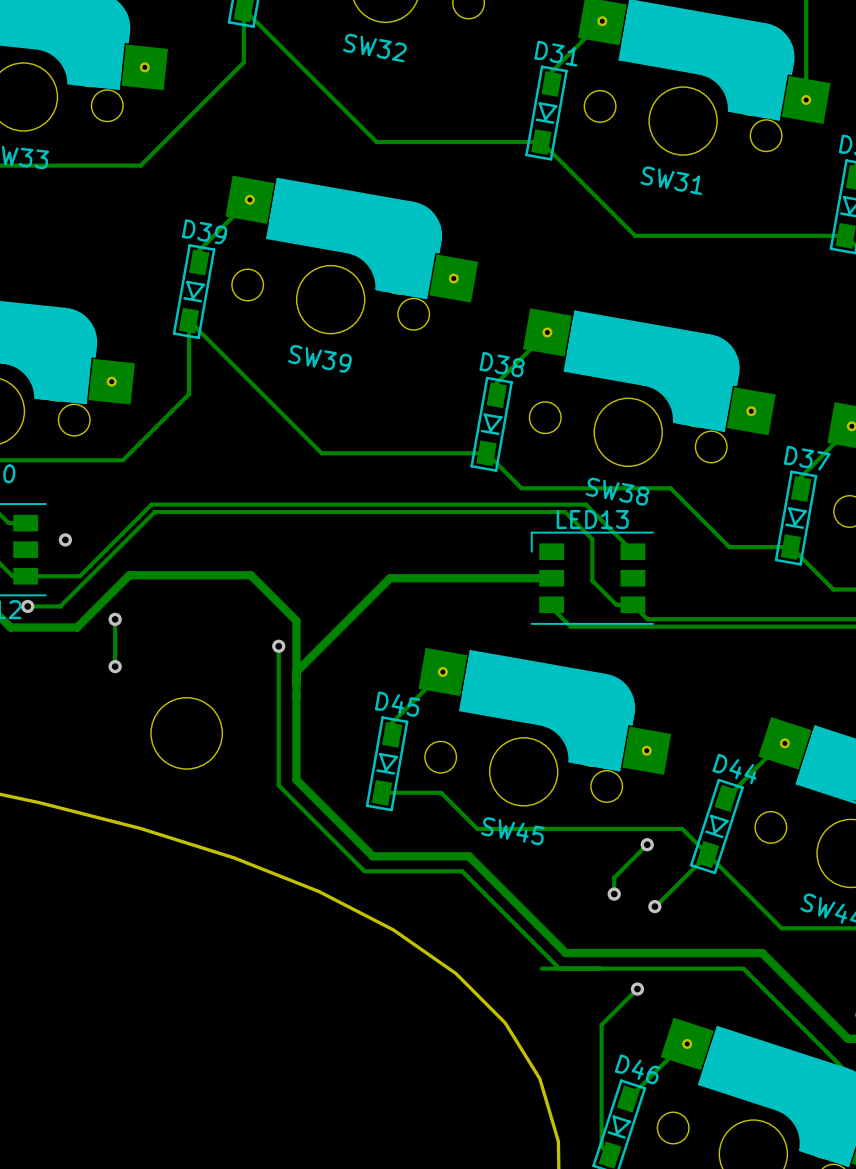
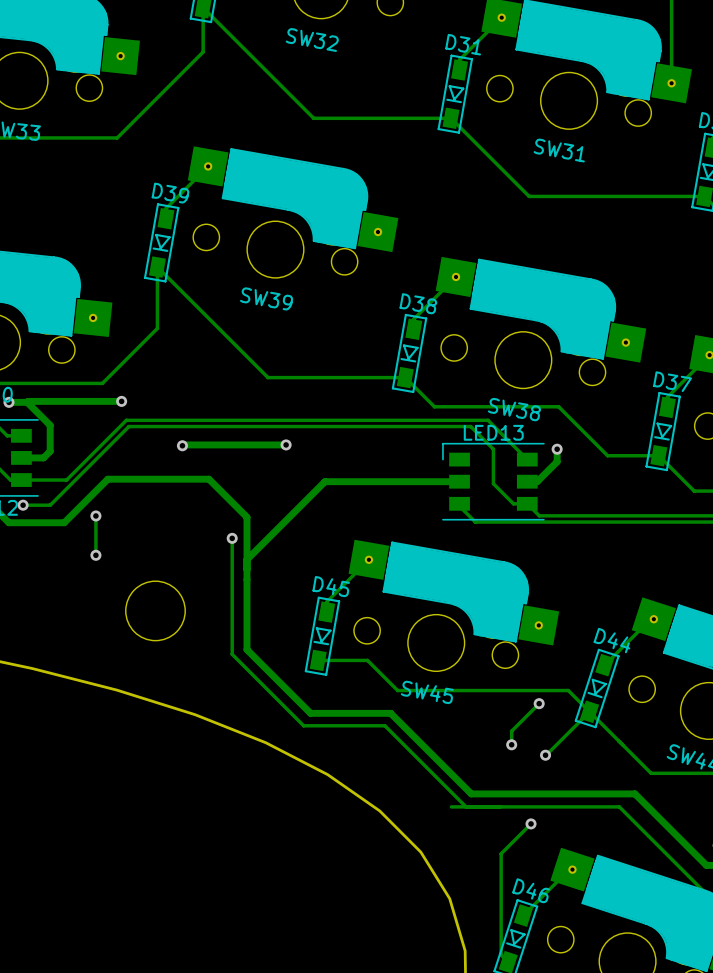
track: none -> (121, 401) (27, 402)
via: none -> (121, 401)
via: none -> (8, 402)
track: none -> (27, 402) (8, 402)
track: none -> (27, 402) (50, 425) (50, 451) (43, 457) (21, 457)
track: none -> (286, 444) (182, 445)
via: none -> (286, 444)
via: none -> (182, 445)
via: (65, 539) -> none
track: none -> (557, 449) (557, 461) (537, 481) (527, 481)
via: none -> (557, 449)

